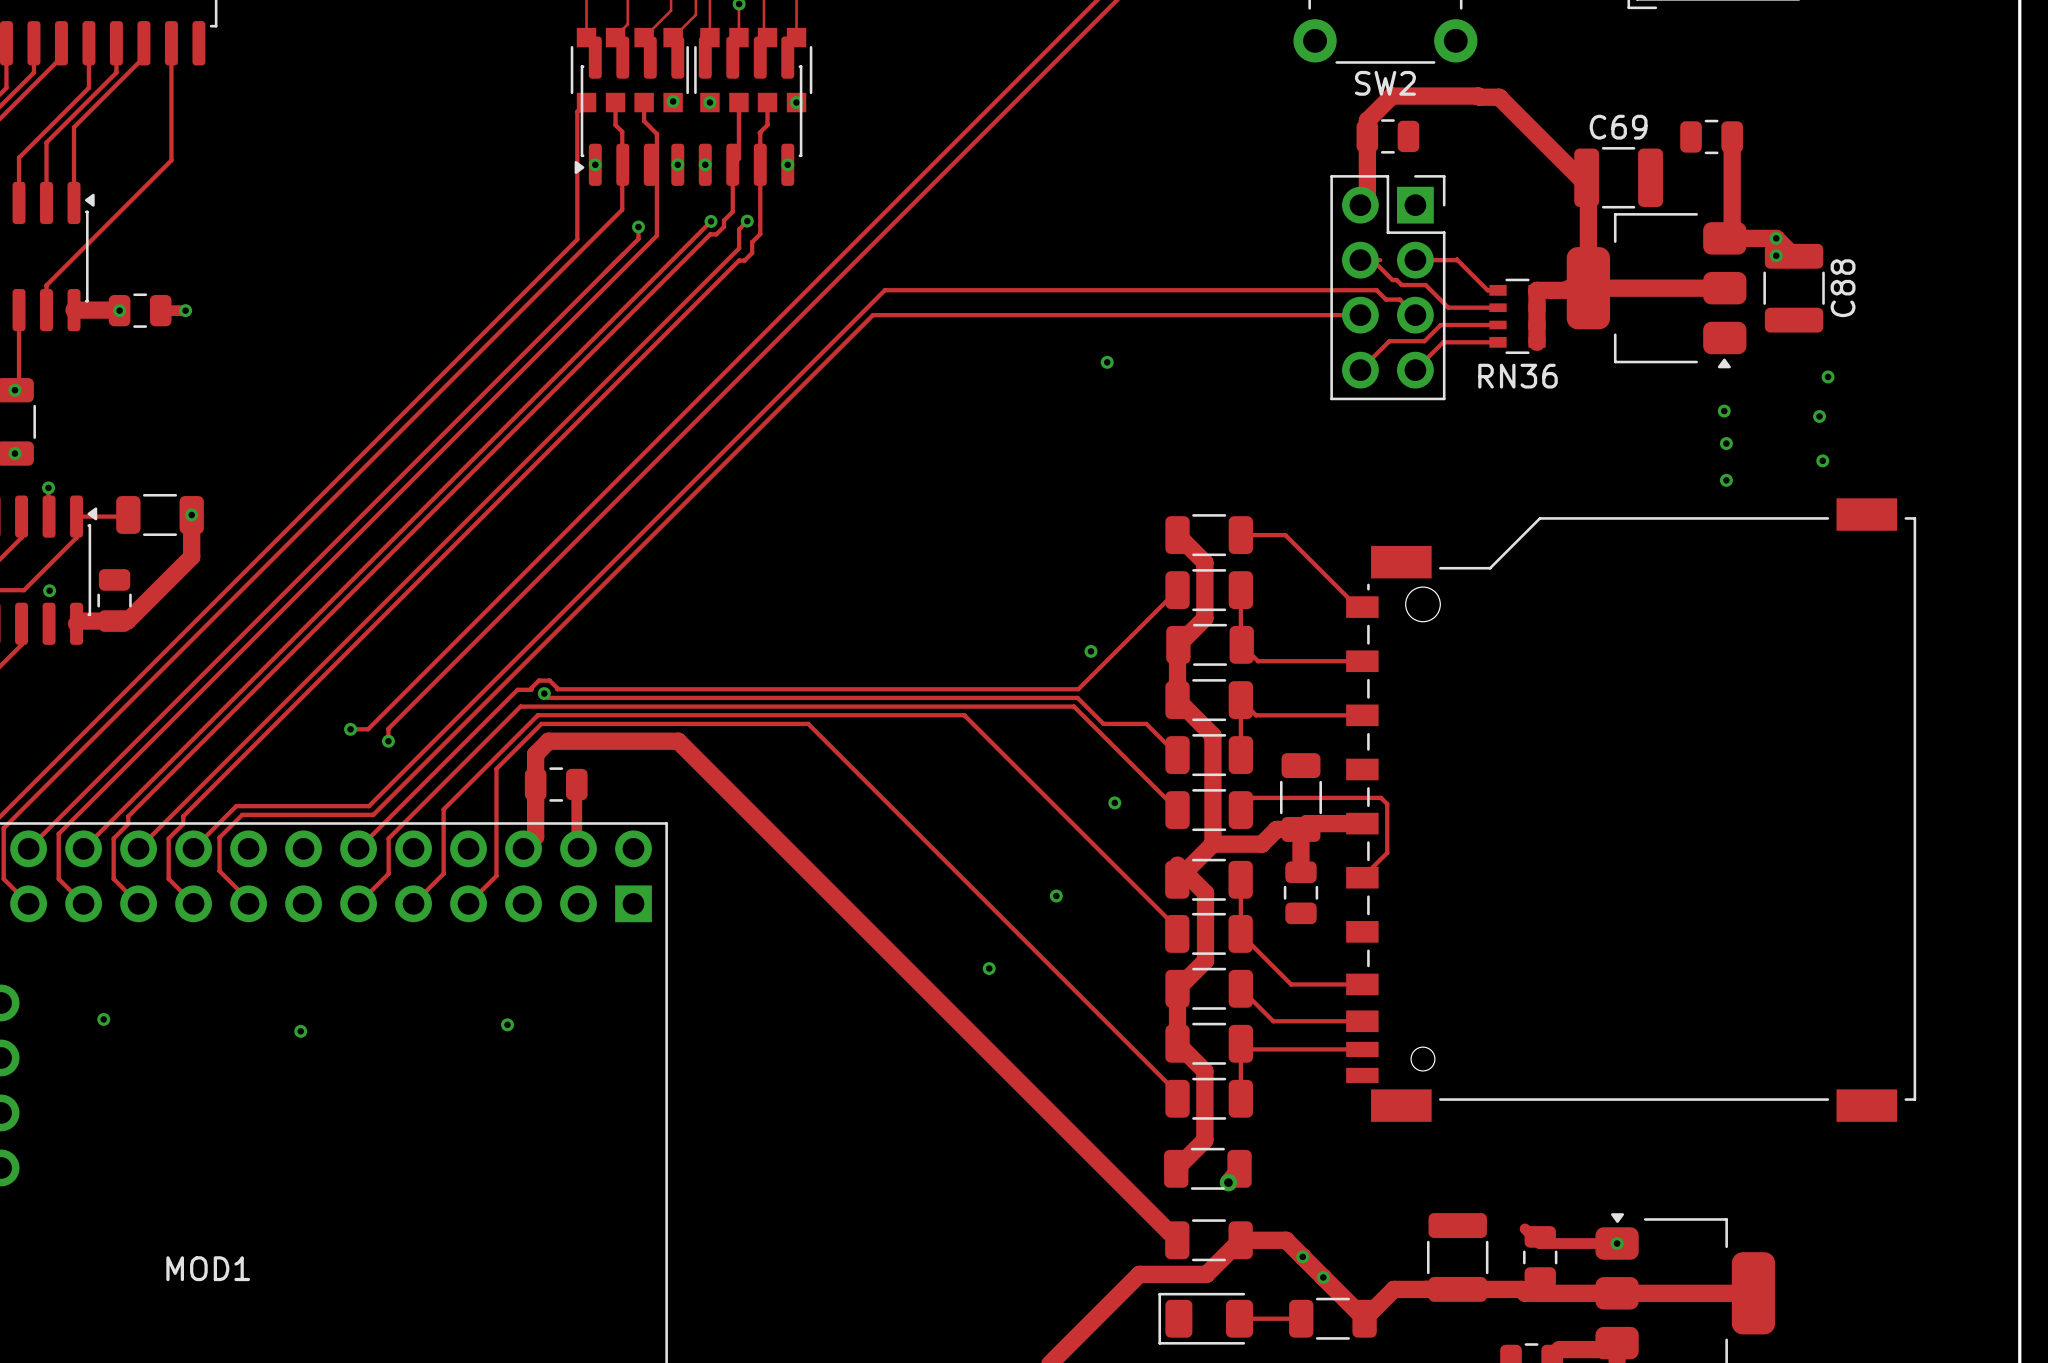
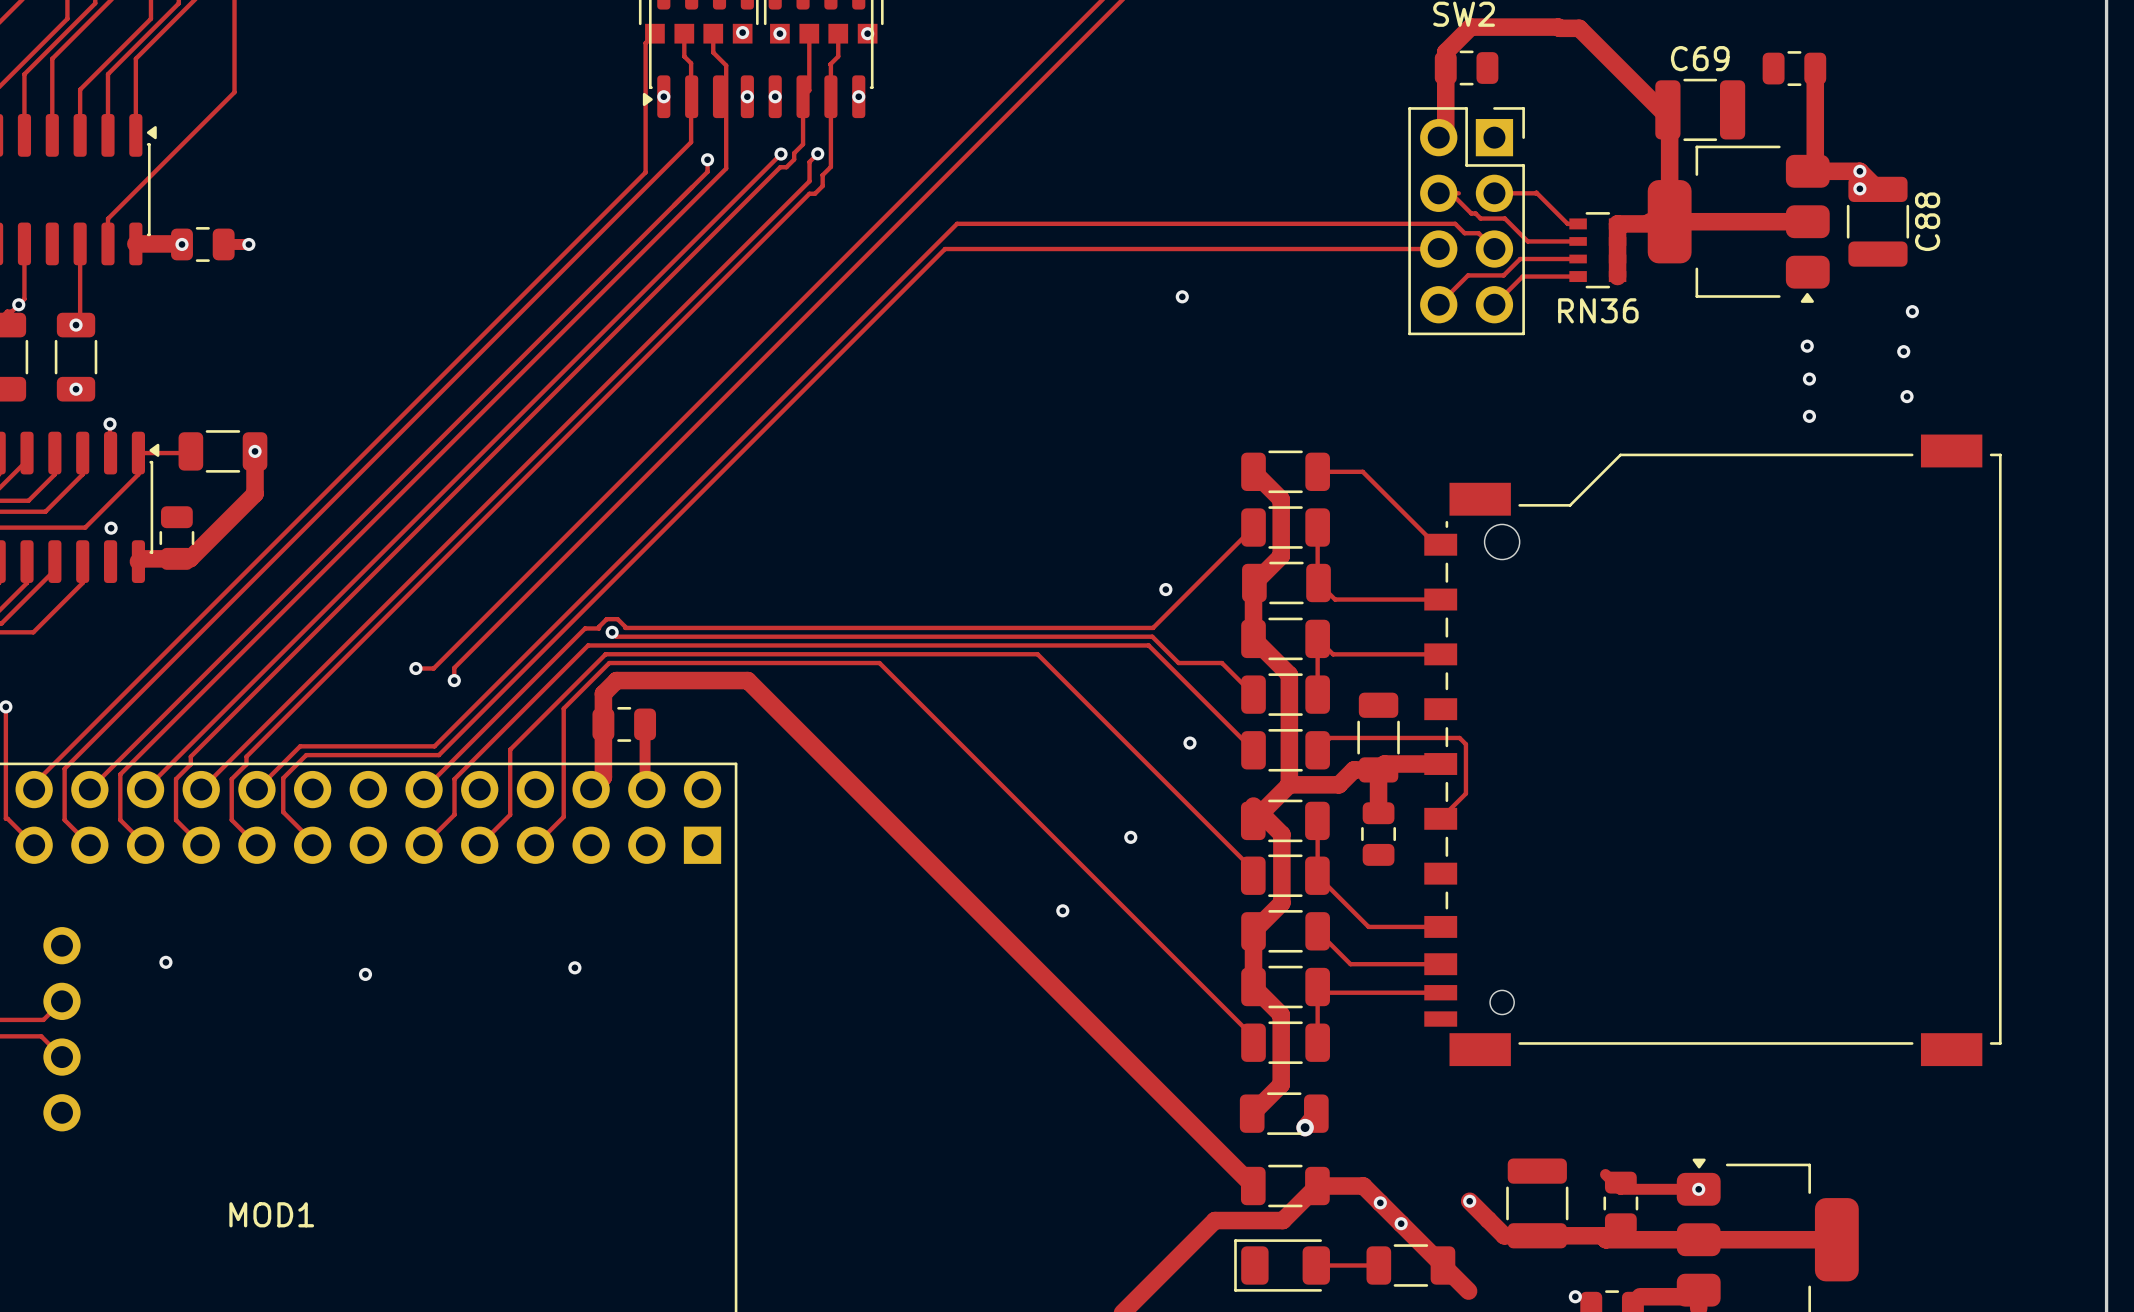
track: none -> (1469, 1201) (1504, 1235)
via: none -> (1469, 1201)
track: (1425, 1289) (1393, 1289) (1364, 1318) -> (1468, 1291) (1442, 1265)
via: none -> (1575, 1296)

